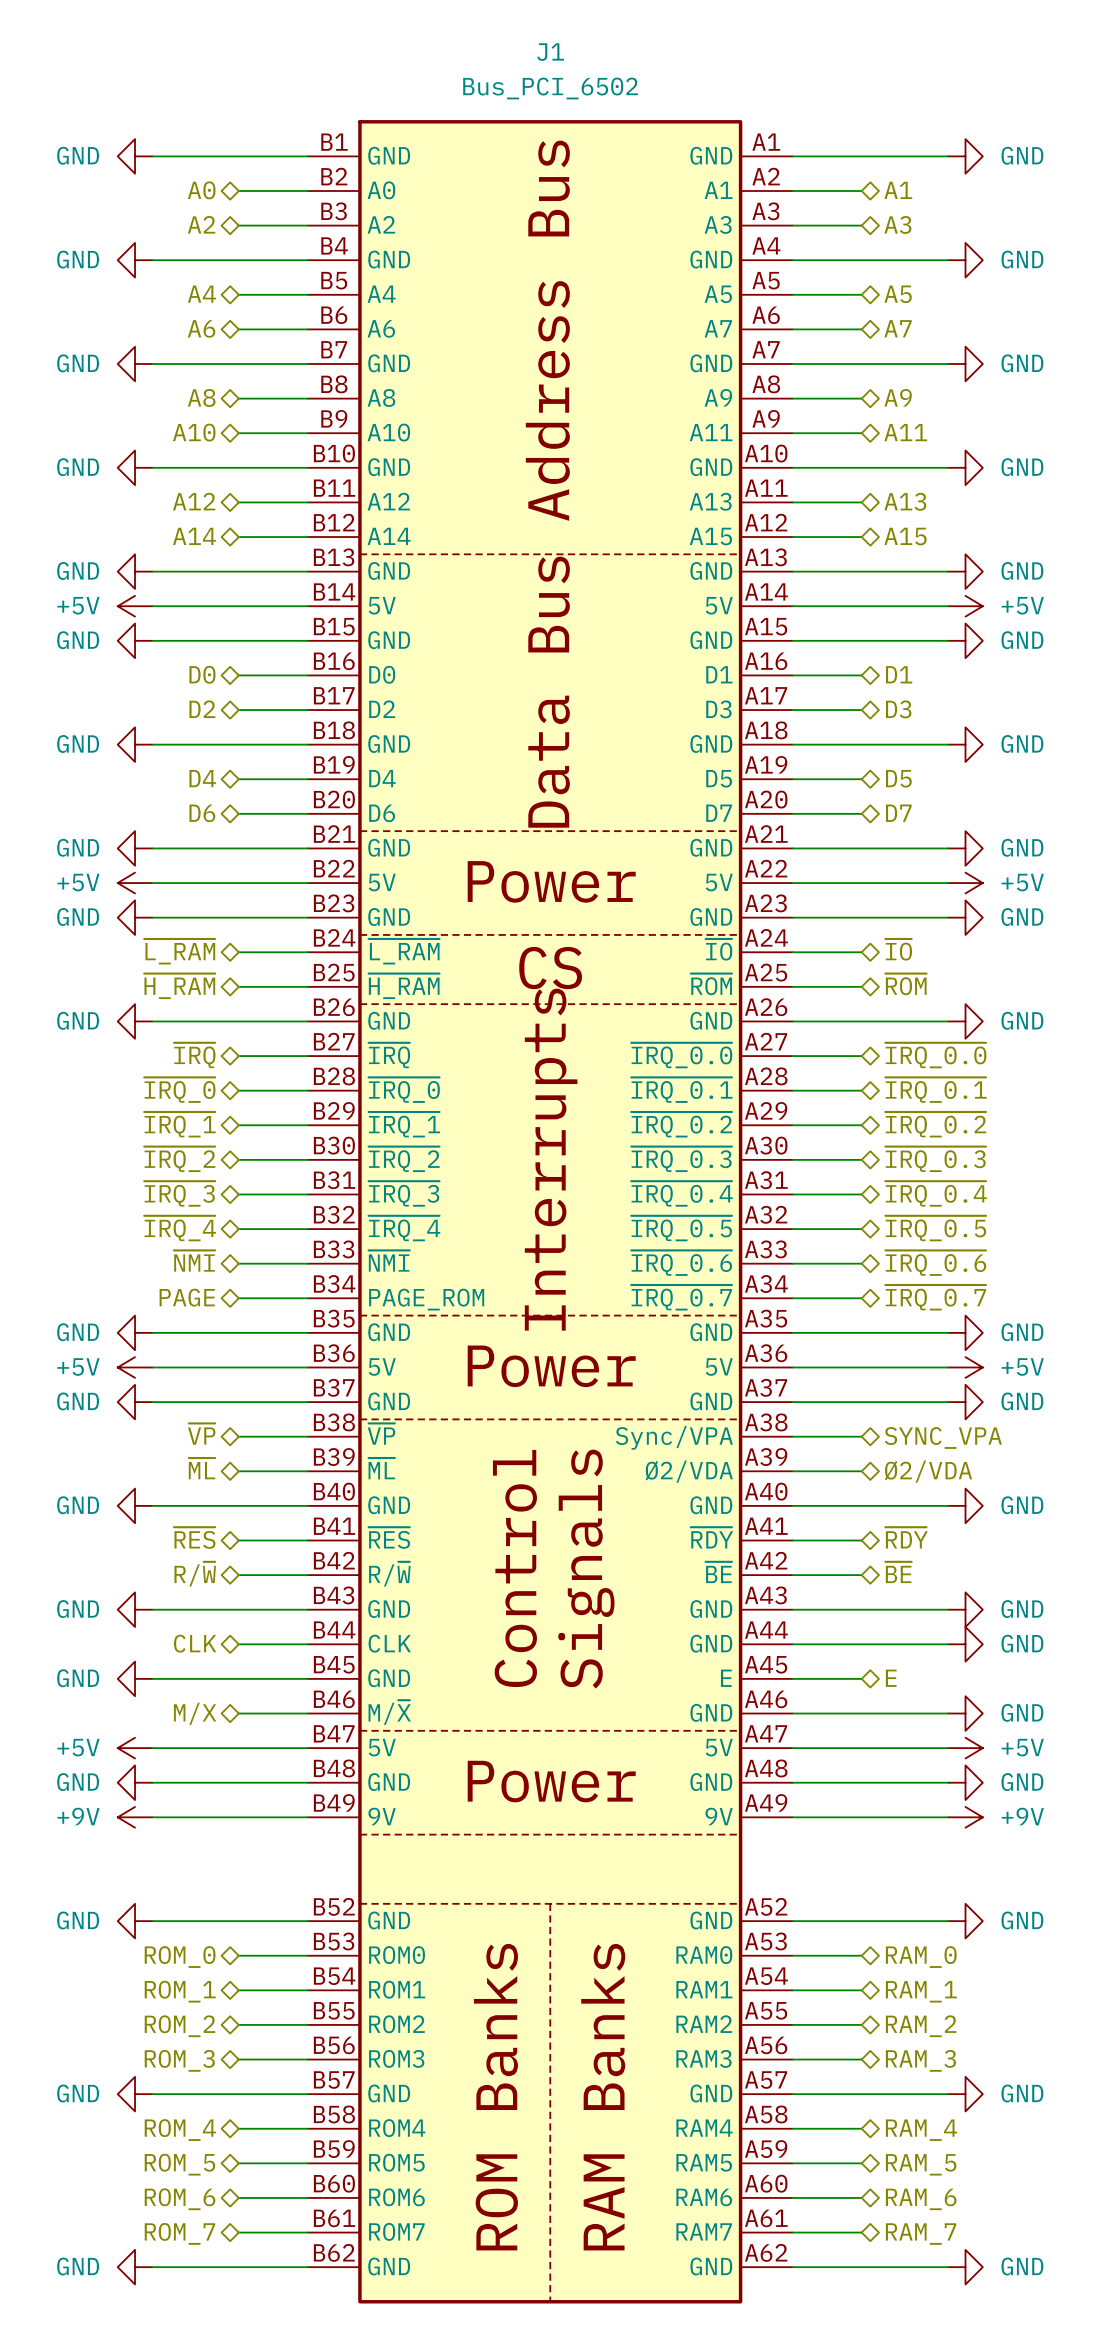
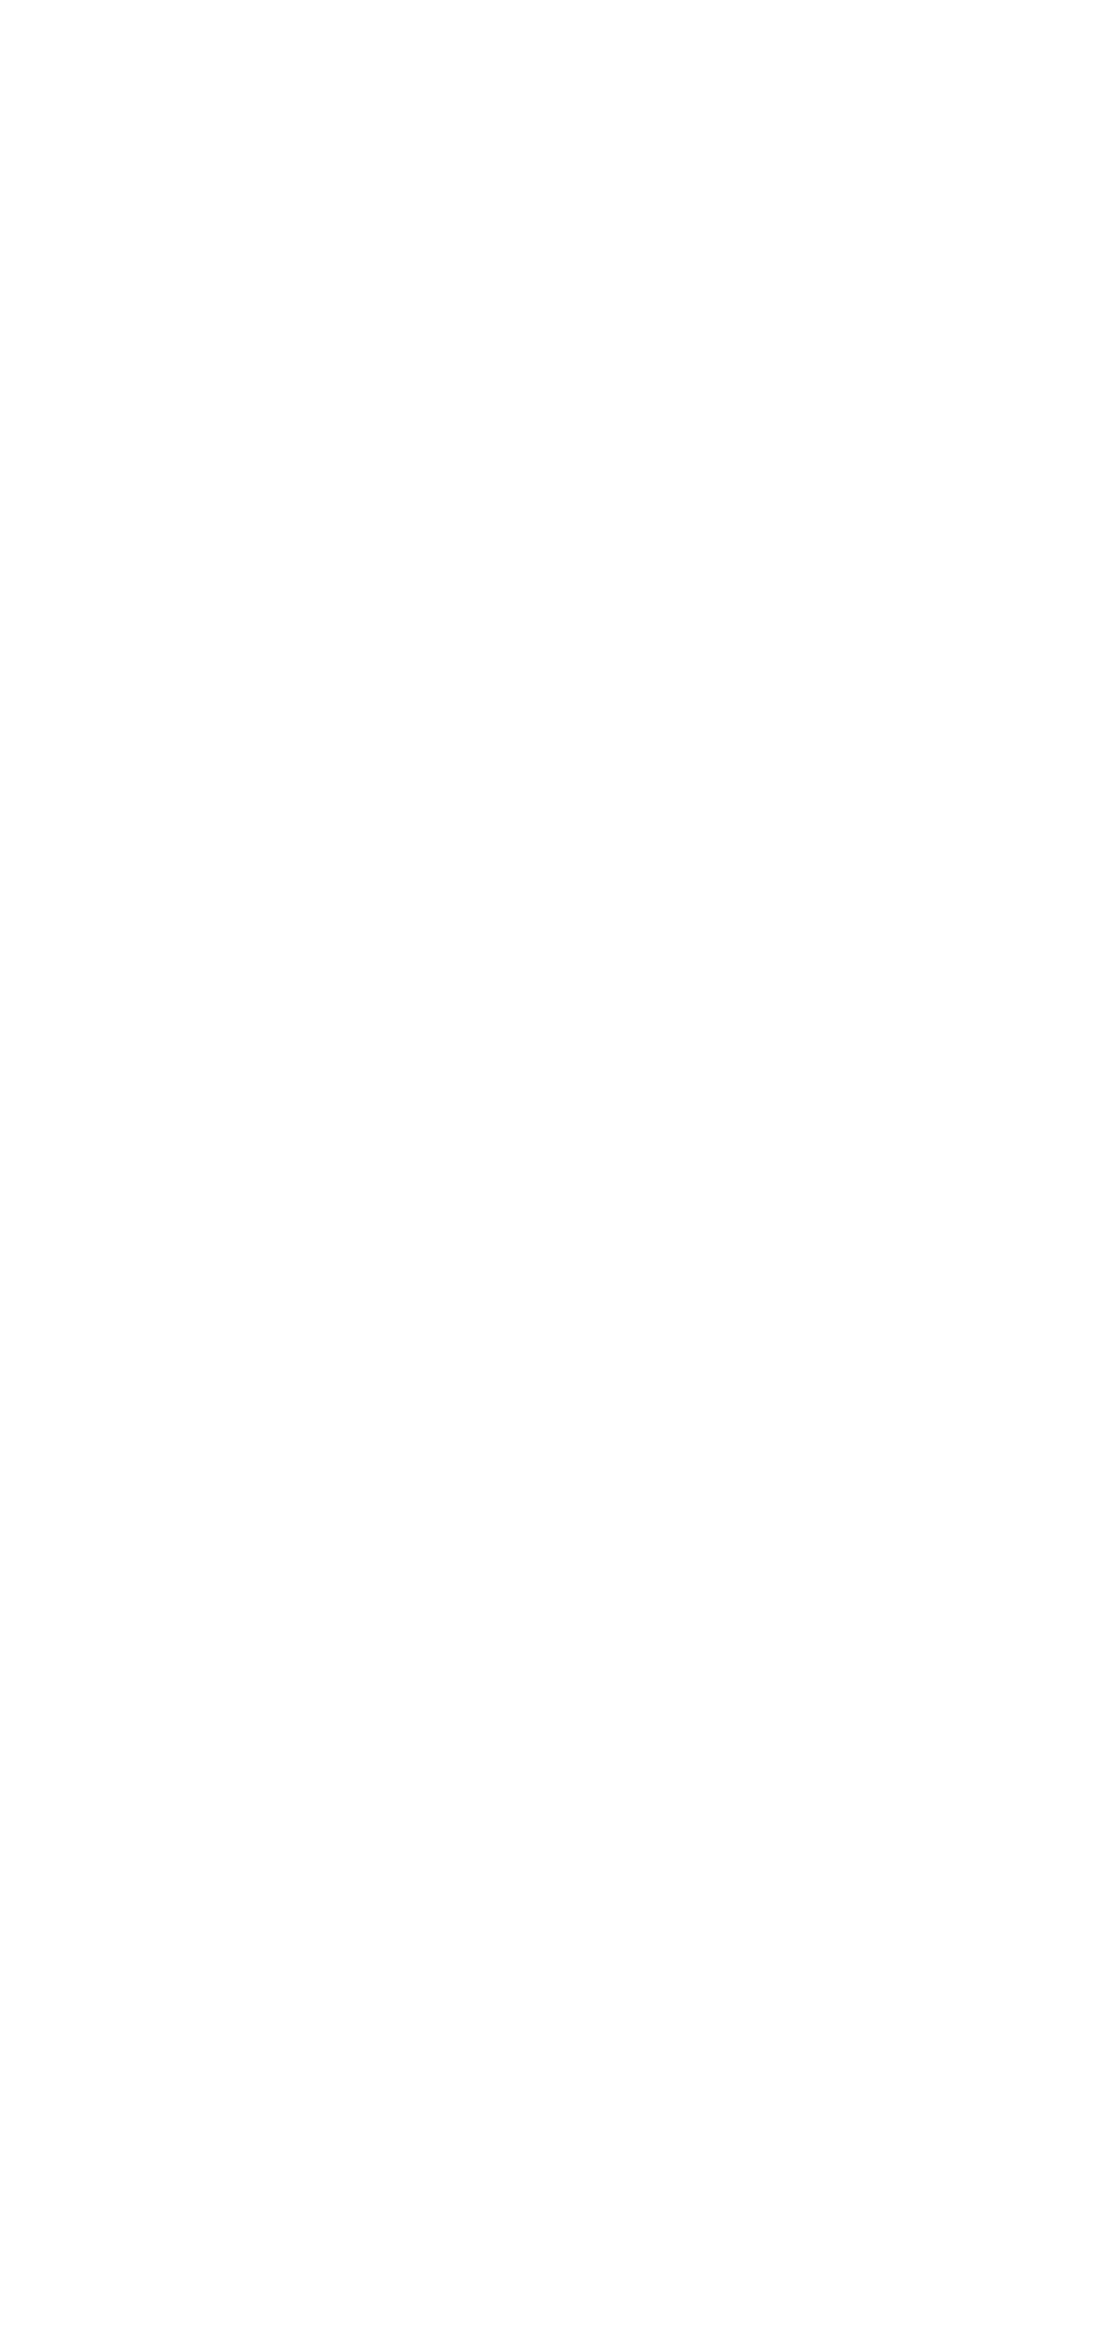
power symbol: GND (135, 156) -> none
wire: (152, 156) (308, 156) -> none
wire: (792, 156) (948, 156) -> none
power symbol: GND (965, 156) -> none
hierarchical label: A0 (201, 190) -> none
hierarchical label: A1 (898, 190) -> none
wire: (238, 191) (308, 191) -> none
wire: (792, 191) (861, 191) -> none
hierarchical label: A2 (201, 224) -> none
hierarchical label: A3 (897, 224) -> none
wire: (238, 225) (308, 225) -> none
wire: (792, 225) (861, 225) -> none
power symbol: GND (135, 260) -> none
wire: (152, 260) (308, 260) -> none
wire: (792, 260) (948, 260) -> none
power symbol: GND (965, 260) -> none
hierarchical label: A4 (201, 294) -> none
wire: (238, 294) (308, 294) -> none
wire: (792, 294) (861, 294) -> none
hierarchical label: A5 (898, 294) -> none
hierarchical label: A6 (201, 328) -> none
hierarchical label: A7 (898, 328) -> none
wire: (238, 329) (308, 329) -> none
wire: (792, 329) (861, 329) -> none
power symbol: GND (135, 364) -> none
wire: (152, 364) (308, 364) -> none
wire: (792, 364) (948, 364) -> none
power symbol: GND (965, 364) -> none
hierarchical label: A8 (201, 397) -> none
hierarchical label: A9 (898, 397) -> none
wire: (238, 398) (308, 398) -> none
wire: (792, 398) (861, 398) -> none
hierarchical label: A10 (194, 432) -> none
hierarchical label: A11 (905, 432) -> none
wire: (238, 433) (308, 433) -> none
wire: (792, 433) (861, 433) -> none
power symbol: GND (135, 467) -> none
wire: (152, 467) (308, 467) -> none
wire: (792, 467) (948, 467) -> none
power symbol: GND (965, 467) -> none
hierarchical label: A12 (194, 501) -> none
hierarchical label: A13 (905, 501) -> none
wire: (238, 502) (308, 502) -> none
wire: (792, 502) (861, 502) -> none
hierarchical label: A14 (194, 536) -> none
hierarchical label: A15 (905, 536) -> none
wire: (238, 537) (308, 537) -> none
wire: (792, 537) (861, 537) -> none
power symbol: GND (135, 571) -> none
wire: (152, 571) (308, 571) -> none
wire: (792, 571) (948, 571) -> none
power symbol: GND (965, 571) -> none
power symbol: +5V (135, 606) -> none
wire: (152, 606) (308, 606) -> none
wire: (792, 606) (948, 606) -> none
power symbol: +5V (965, 606) -> none
power symbol: GND (135, 640) -> none
wire: (152, 640) (308, 640) -> none
wire: (792, 640) (948, 640) -> none
power symbol: GND (965, 640) -> none
hierarchical label: D0 (202, 674) -> none
hierarchical label: D1 (899, 674) -> none
wire: (238, 675) (308, 675) -> none
wire: (792, 675) (861, 675) -> none
hierarchical label: D2 (202, 709) -> none
hierarchical label: D3 (898, 709) -> none
wire: (238, 710) (308, 710) -> none
wire: (792, 710) (861, 710) -> none
power symbol: GND (135, 744) -> none
wire: (152, 744) (308, 744) -> none
wire: (792, 744) (948, 744) -> none
power symbol: GND (965, 744) -> none
hierarchical label: D4 (202, 778) -> none
hierarchical label: D5 (898, 778) -> none
wire: (238, 779) (308, 779) -> none
wire: (792, 779) (861, 779) -> none
hierarchical label: D6 (202, 813) -> none
wire: (238, 813) (308, 813) -> none
wire: (792, 813) (861, 813) -> none
hierarchical label: D7 (898, 813) -> none
power symbol: GND (135, 848) -> none
wire: (152, 848) (308, 848) -> none
wire: (792, 848) (948, 848) -> none
power symbol: GND (965, 848) -> none
power symbol: +5V (135, 883) -> none
wire: (152, 883) (308, 883) -> none
wire: (792, 883) (948, 883) -> none
power symbol: +5V (965, 883) -> none
power symbol: GND (135, 917) -> none
wire: (152, 917) (308, 917) -> none
wire: (792, 917) (948, 917) -> none
power symbol: GND (965, 917) -> none
hierarchical label: ~{IO} (898, 949) -> none
hierarchical label: ~{L_RAM} (179, 951) -> none
wire: (238, 952) (308, 952) -> none
wire: (792, 952) (861, 952) -> none
hierarchical label: ~{ROM} (905, 984) -> none
hierarchical label: ~{H_RAM} (179, 986) -> none
wire: (238, 986) (308, 986) -> none
wire: (792, 986) (861, 986) -> none
power symbol: GND (135, 1021) -> none
wire: (152, 1021) (308, 1021) -> none
wire: (792, 1021) (948, 1021) -> none
power symbol: GND (965, 1021) -> none
hierarchical label: ~{IRQ} (194, 1055) -> none
hierarchical label: ~{IRQ_0.0} (935, 1055) -> none
wire: (238, 1056) (308, 1056) -> none
wire: (792, 1056) (861, 1056) -> none
hierarchical label: ~{IRQ_0} (179, 1090) -> none
wire: (238, 1090) (308, 1090) -> none
wire: (792, 1090) (861, 1090) -> none
hierarchical label: ~{IRQ_0.1} (935, 1090) -> none
hierarchical label: ~{IRQ_1} (179, 1124) -> none
hierarchical label: ~{IRQ_0.2} (935, 1124) -> none
wire: (238, 1125) (308, 1125) -> none
wire: (792, 1125) (861, 1125) -> none
hierarchical label: ~{IRQ_2} (179, 1159) -> none
wire: (238, 1159) (308, 1159) -> none
wire: (792, 1159) (861, 1159) -> none
hierarchical label: ~{IRQ_0.3} (935, 1159) -> none
hierarchical label: ~{IRQ_3} (179, 1193) -> none
hierarchical label: ~{IRQ_0.4} (936, 1193) -> none
wire: (238, 1194) (308, 1194) -> none
wire: (792, 1194) (861, 1194) -> none
J1: Bus_PCI_6502 (550, 1211) -> none
hierarchical label: ~{IRQ_4} (180, 1228) -> none
hierarchical label: ~{IRQ_0.5} (935, 1228) -> none
wire: (238, 1229) (308, 1229) -> none
wire: (792, 1229) (861, 1229) -> none
hierarchical label: ~{NMI} (194, 1261) -> none
wire: (238, 1263) (308, 1263) -> none
wire: (792, 1263) (861, 1263) -> none
hierarchical label: ~{IRQ_0.6} (935, 1263) -> none
hierarchical label: PAGE (187, 1297) -> none
hierarchical label: ~{IRQ_0.7} (935, 1297) -> none
wire: (238, 1298) (308, 1298) -> none
wire: (792, 1298) (861, 1298) -> none
power symbol: GND (135, 1332) -> none
wire: (152, 1332) (308, 1332) -> none
wire: (792, 1332) (948, 1332) -> none
power symbol: GND (965, 1332) -> none
power symbol: +5V (135, 1367) -> none
wire: (152, 1367) (308, 1367) -> none
wire: (792, 1367) (948, 1367) -> none
power symbol: +5V (965, 1367) -> none
power symbol: GND (135, 1402) -> none
wire: (152, 1402) (308, 1402) -> none
wire: (792, 1402) (948, 1402) -> none
power symbol: GND (965, 1402) -> none
hierarchical label: ~{VP} (201, 1434) -> none
wire: (238, 1436) (308, 1436) -> none
wire: (792, 1436) (861, 1436) -> none
hierarchical label: SYNC_VPA (943, 1437) -> none
hierarchical label: ~{ML} (202, 1468) -> none
wire: (238, 1471) (308, 1471) -> none
wire: (792, 1471) (861, 1471) -> none
hierarchical label: Ø2/VDA (928, 1471) -> none
power symbol: GND (135, 1505) -> none
wire: (152, 1505) (308, 1505) -> none
wire: (792, 1505) (948, 1505) -> none
power symbol: GND (965, 1505) -> none
hierarchical label: ~{RDY} (906, 1537) -> none
hierarchical label: ~{RES} (194, 1538) -> none
wire: (238, 1540) (308, 1540) -> none
wire: (792, 1540) (861, 1540) -> none
hierarchical label: ~{BE} (898, 1572) -> none
hierarchical label: R/~{W} (195, 1574) -> none
wire: (238, 1575) (308, 1575) -> none
wire: (792, 1575) (861, 1575) -> none
power symbol: GND (135, 1609) -> none
wire: (152, 1609) (308, 1609) -> none
wire: (792, 1609) (948, 1609) -> none
power symbol: GND (965, 1609) -> none
hierarchical label: CLK (195, 1643) -> none
wire: (238, 1644) (308, 1644) -> none
wire: (792, 1644) (948, 1644) -> none
power symbol: GND (965, 1644) -> none
power symbol: GND (135, 1678) -> none
wire: (152, 1678) (308, 1678) -> none
wire: (792, 1678) (861, 1678) -> none
hierarchical label: E (891, 1678) -> none
hierarchical label: M/X (195, 1713) -> none
wire: (238, 1713) (308, 1713) -> none
wire: (792, 1713) (948, 1713) -> none
power symbol: GND (965, 1713) -> none
power symbol: +5V (135, 1748) -> none
wire: (152, 1748) (308, 1748) -> none
wire: (792, 1748) (948, 1748) -> none
power symbol: +5V (965, 1748) -> none
power symbol: GND (135, 1782) -> none
wire: (152, 1782) (308, 1782) -> none
wire: (792, 1782) (948, 1782) -> none
power symbol: GND (965, 1782) -> none
power symbol: +9V (135, 1817) -> none
wire: (152, 1817) (308, 1817) -> none
wire: (792, 1817) (948, 1817) -> none
power symbol: +9V (965, 1817) -> none
power symbol: GND (135, 1921) -> none
wire: (152, 1921) (308, 1921) -> none
wire: (792, 1921) (948, 1921) -> none
power symbol: GND (965, 1921) -> none
wire: (238, 1955) (308, 1955) -> none
wire: (792, 1955) (861, 1955) -> none
hierarchical label: ROM_0 (180, 1957) -> none
hierarchical label: RAM_0 (921, 1957) -> none
wire: (238, 1990) (308, 1990) -> none
wire: (792, 1990) (861, 1990) -> none
hierarchical label: ROM_1 (180, 1991) -> none
hierarchical label: RAM_1 (921, 1991) -> none
wire: (238, 2024) (308, 2024) -> none
wire: (792, 2024) (861, 2024) -> none
hierarchical label: ROM_2 (180, 2026) -> none
hierarchical label: RAM_2 (921, 2026) -> none
wire: (238, 2059) (308, 2059) -> none
wire: (792, 2059) (861, 2059) -> none
hierarchical label: ROM_3 (179, 2060) -> none
hierarchical label: RAM_3 (920, 2060) -> none
power symbol: GND (135, 2094) -> none
wire: (152, 2094) (308, 2094) -> none
wire: (792, 2094) (948, 2094) -> none
power symbol: GND (965, 2094) -> none
wire: (238, 2128) (308, 2128) -> none
wire: (792, 2128) (861, 2128) -> none
hierarchical label: ROM_4 (180, 2130) -> none
hierarchical label: RAM_4 (921, 2130) -> none
wire: (238, 2163) (308, 2163) -> none
wire: (792, 2163) (861, 2163) -> none
hierarchical label: ROM_5 (179, 2164) -> none
hierarchical label: RAM_5 (921, 2164) -> none
wire: (238, 2197) (308, 2197) -> none
wire: (792, 2197) (861, 2197) -> none
hierarchical label: ROM_6 (180, 2199) -> none
hierarchical label: RAM_6 (921, 2199) -> none
wire: (238, 2232) (308, 2232) -> none
wire: (792, 2232) (861, 2232) -> none
hierarchical label: ROM_7 (179, 2233) -> none
hierarchical label: RAM_7 (921, 2234) -> none
power symbol: GND (135, 2267) -> none
wire: (152, 2267) (308, 2267) -> none
wire: (792, 2267) (948, 2267) -> none
power symbol: GND (965, 2267) -> none

